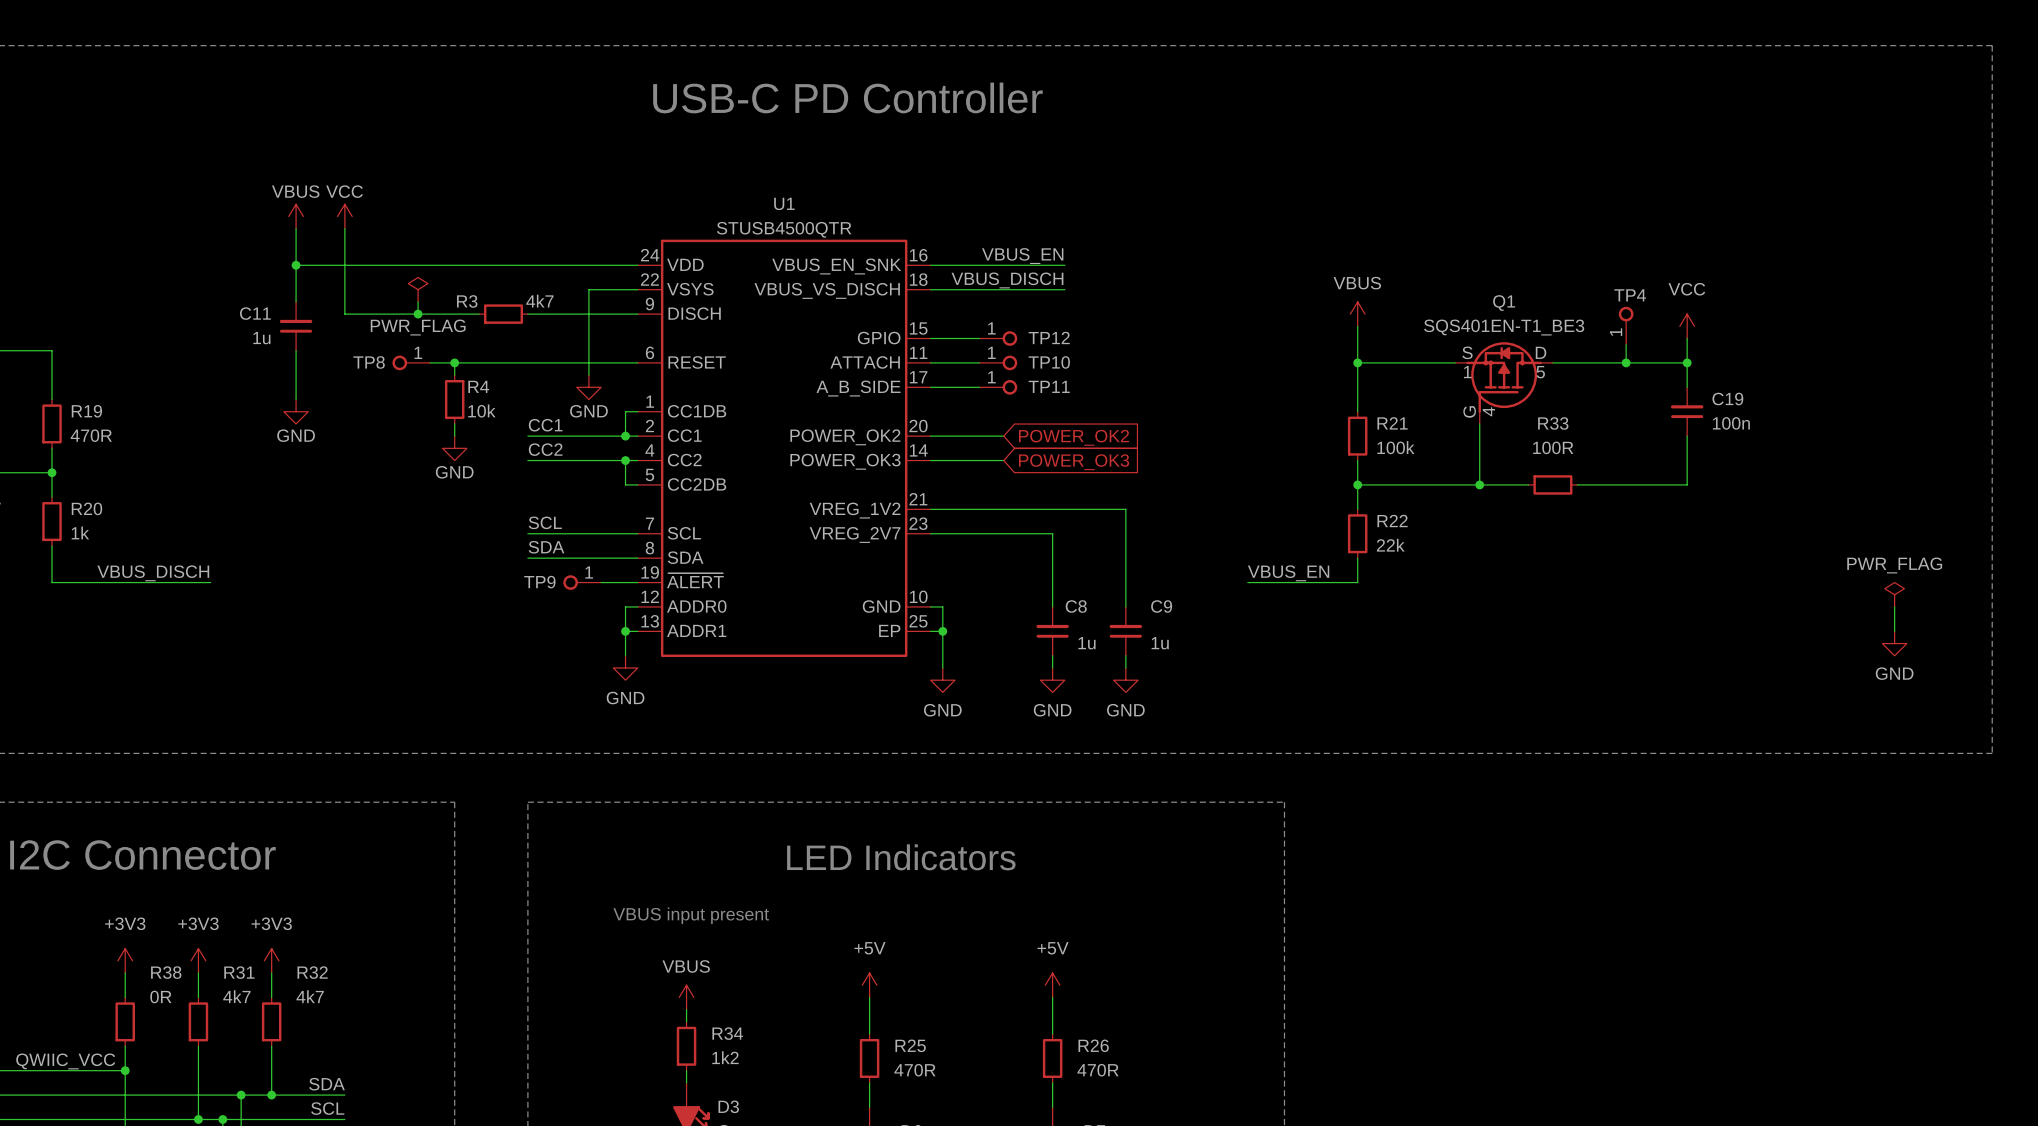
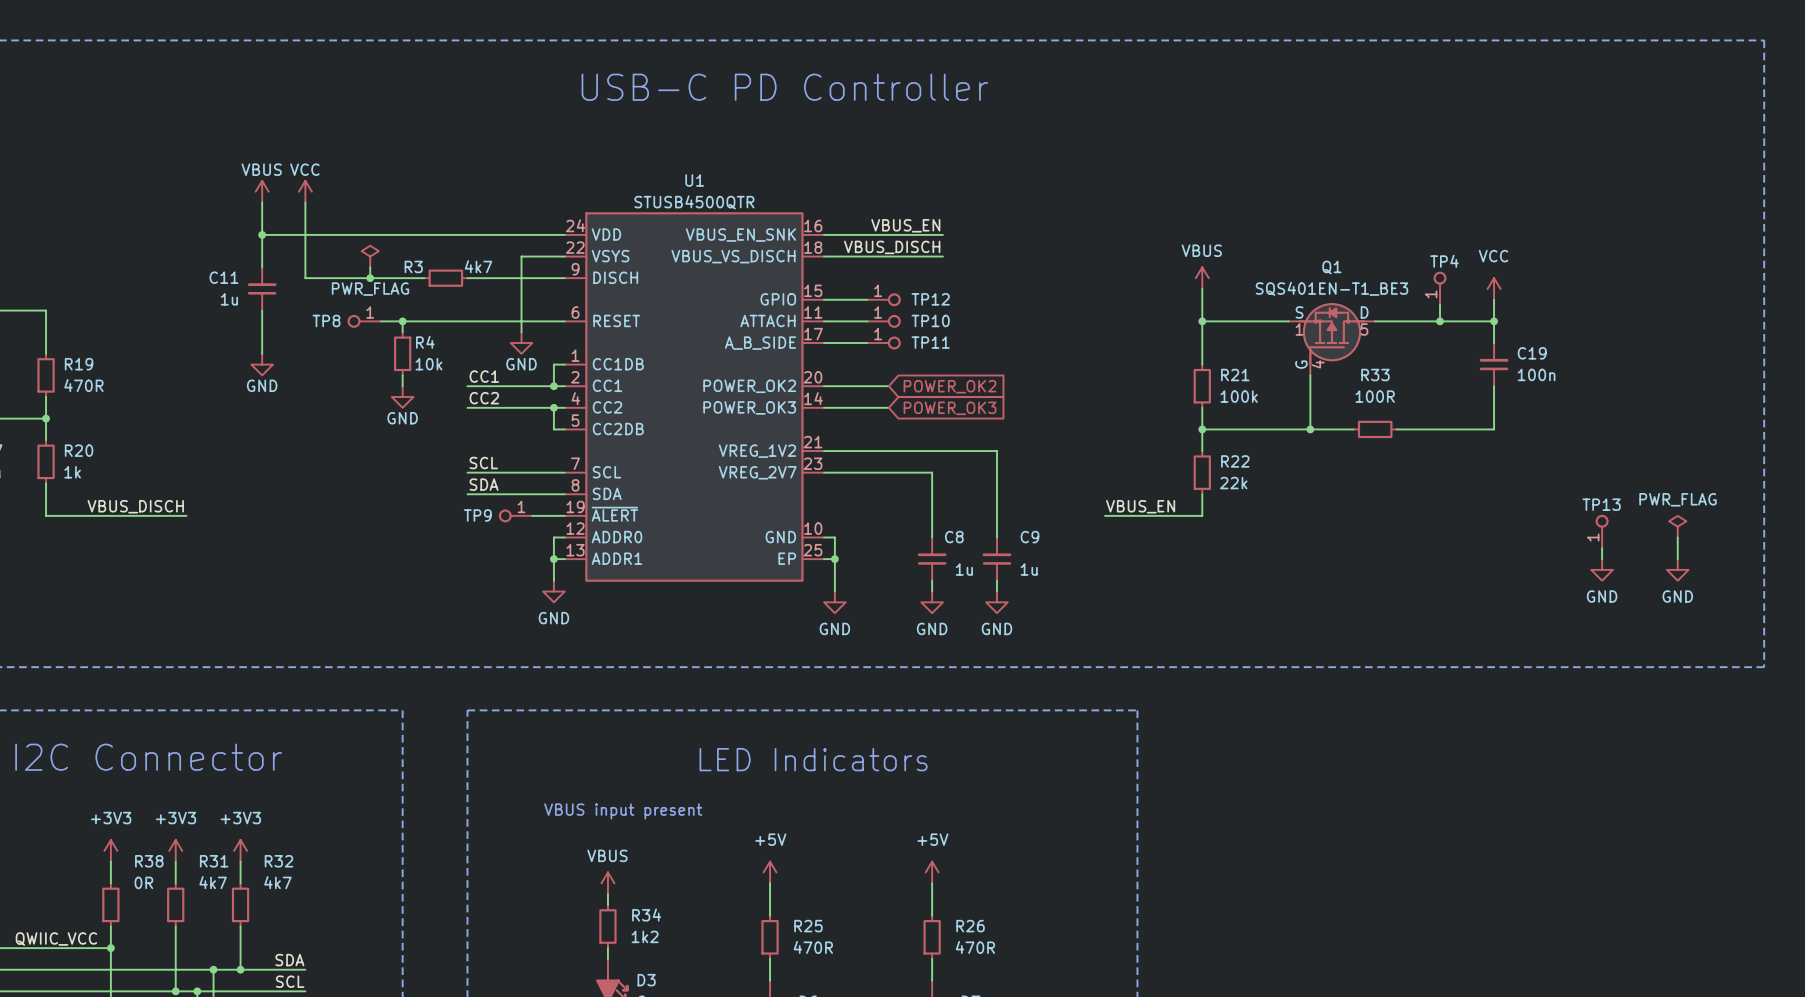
TP13: none -> (1602, 531)
wire: none -> (1602, 548) (1602, 559)
power symbol: none -> GND (1602, 569)

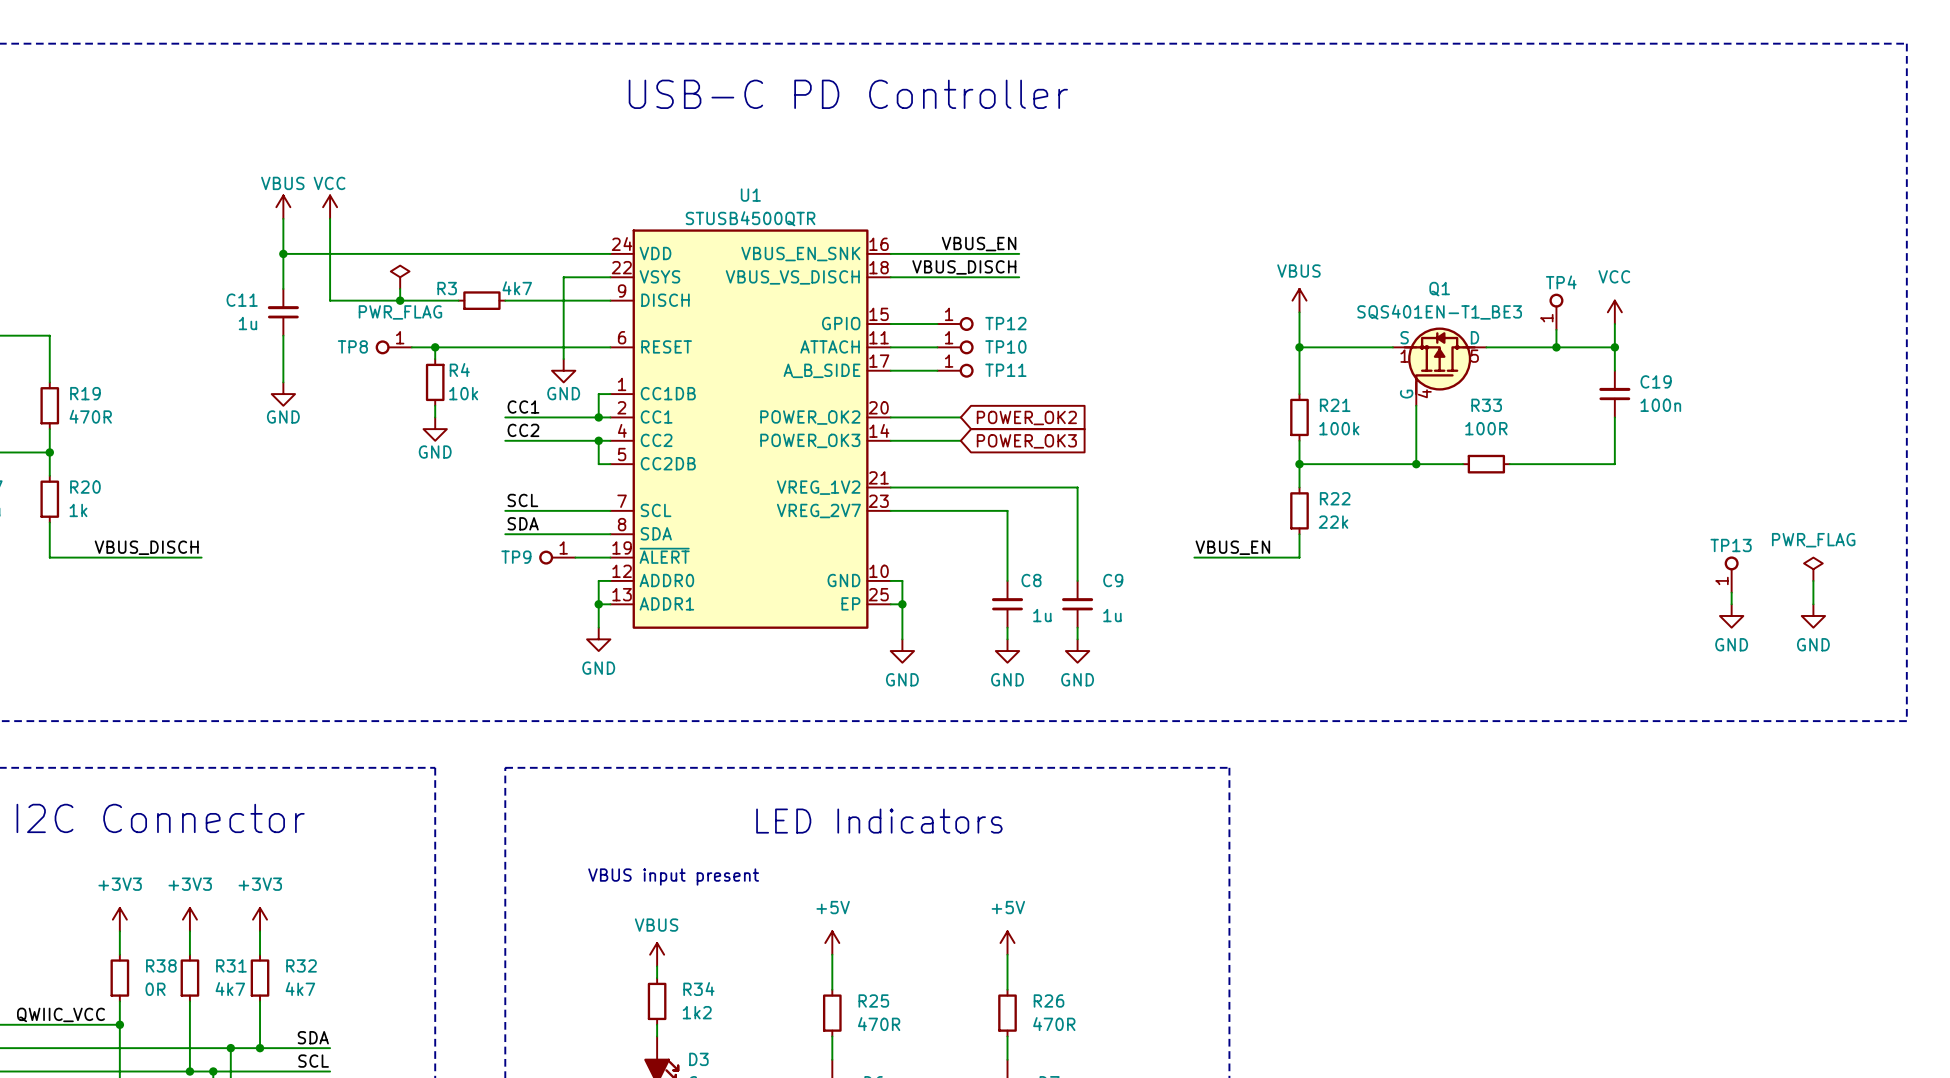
R38 name position: R38 (149, 861) -> R38 (161, 965)
R31 name position: R31 (214, 861) -> R31 (231, 965)
R32 name position: R32 (278, 861) -> R32 (301, 965)
R38 text position: 0R (143, 882) -> 0R (155, 989)
R31 text position: 4k7 (213, 882) -> 4k7 (230, 989)
R32 text position: 4k7 (277, 882) -> 4k7 (300, 989)

